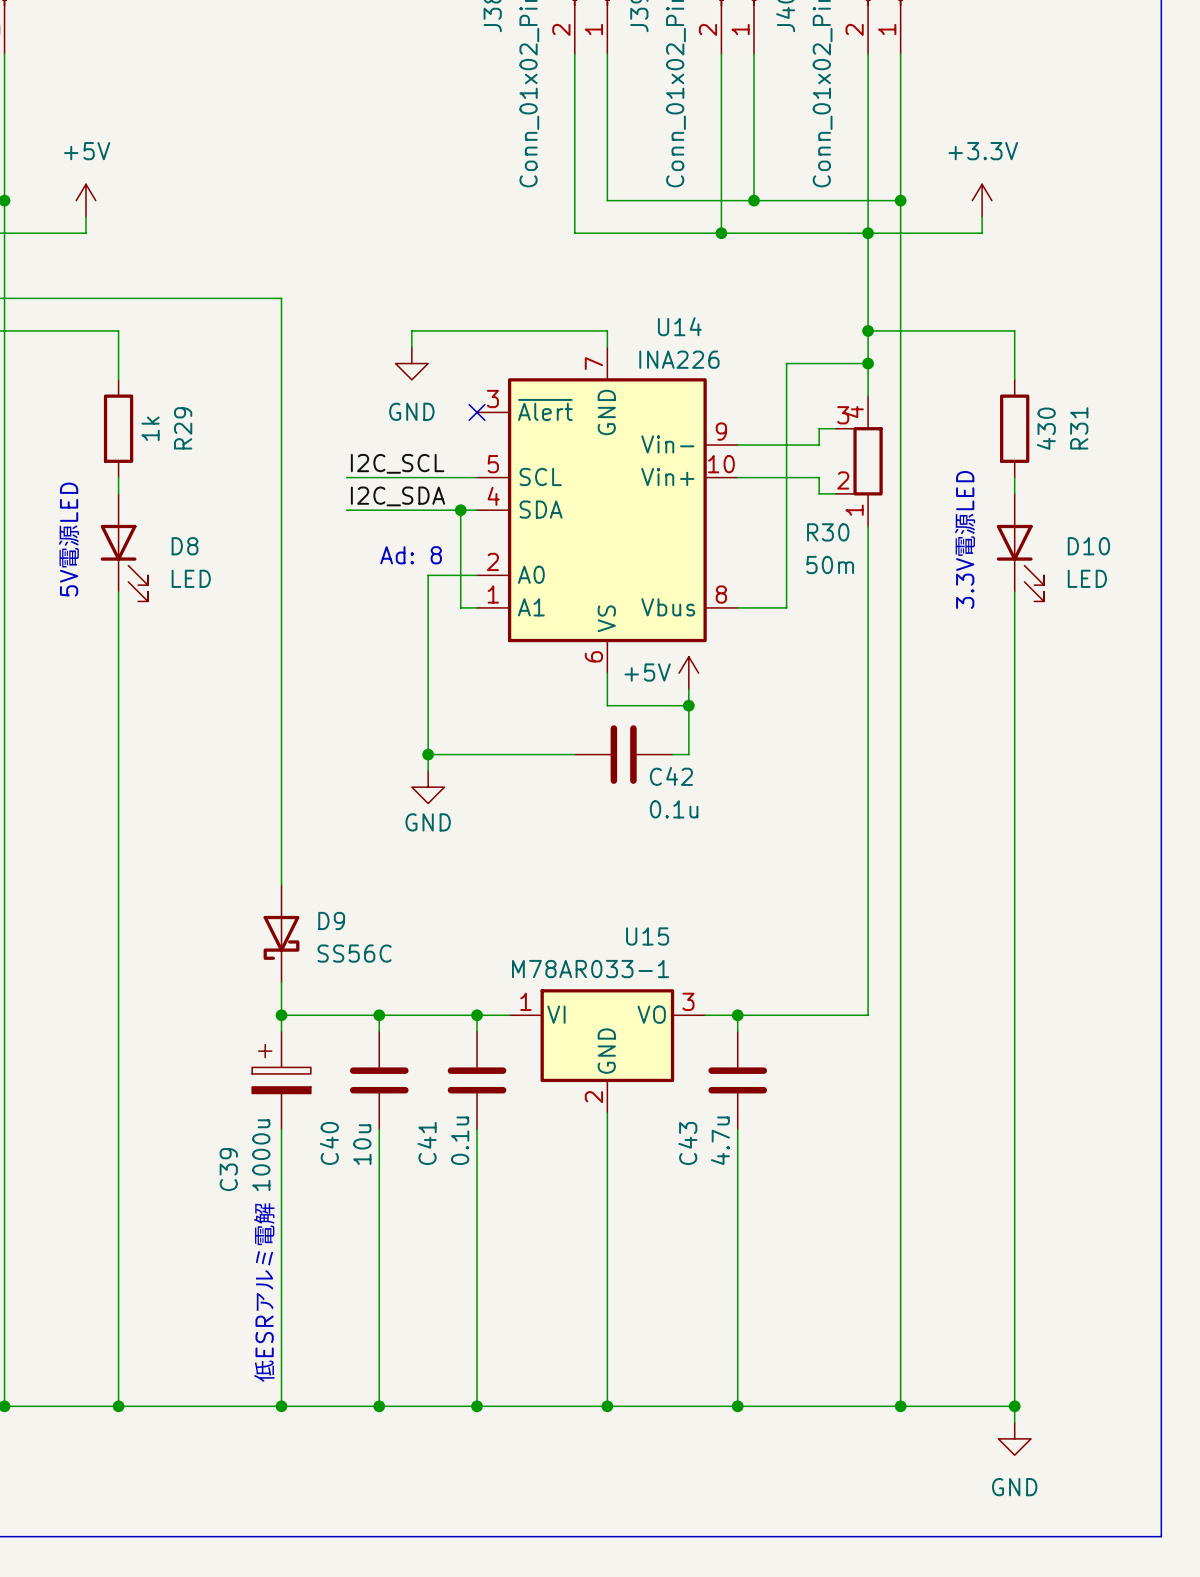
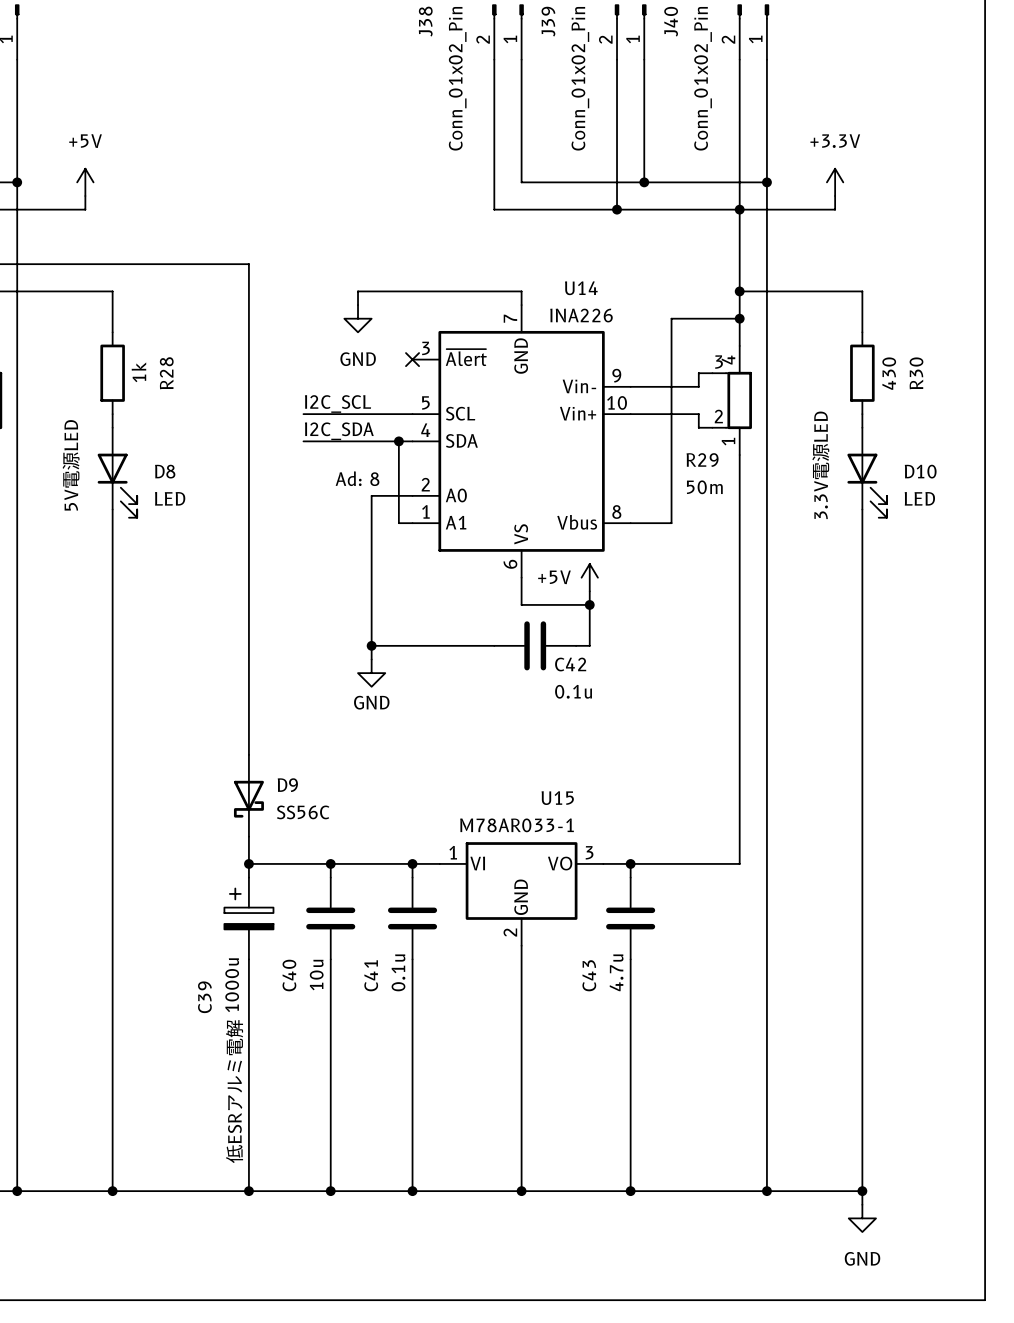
R29 name: R29 (183, 428) -> R28 (166, 373)
R31 name: R31 (1079, 428) -> R30 (916, 373)
R30 name: R30 (828, 532) -> R29 (702, 460)

